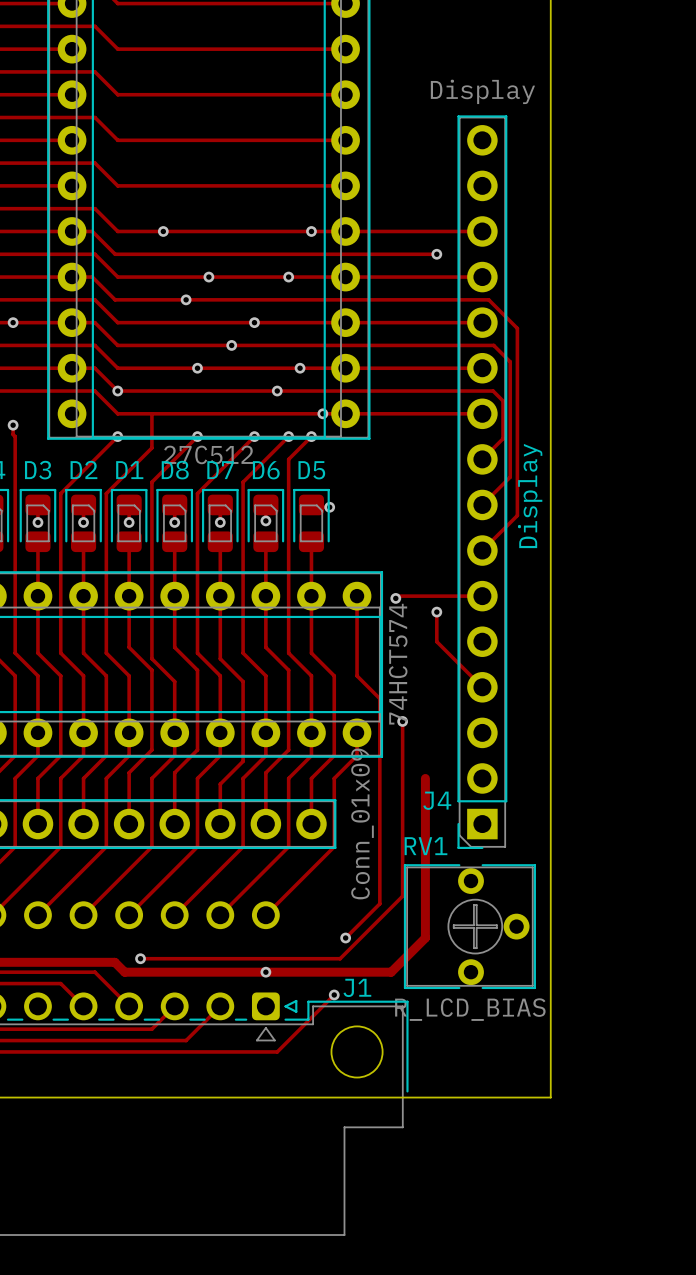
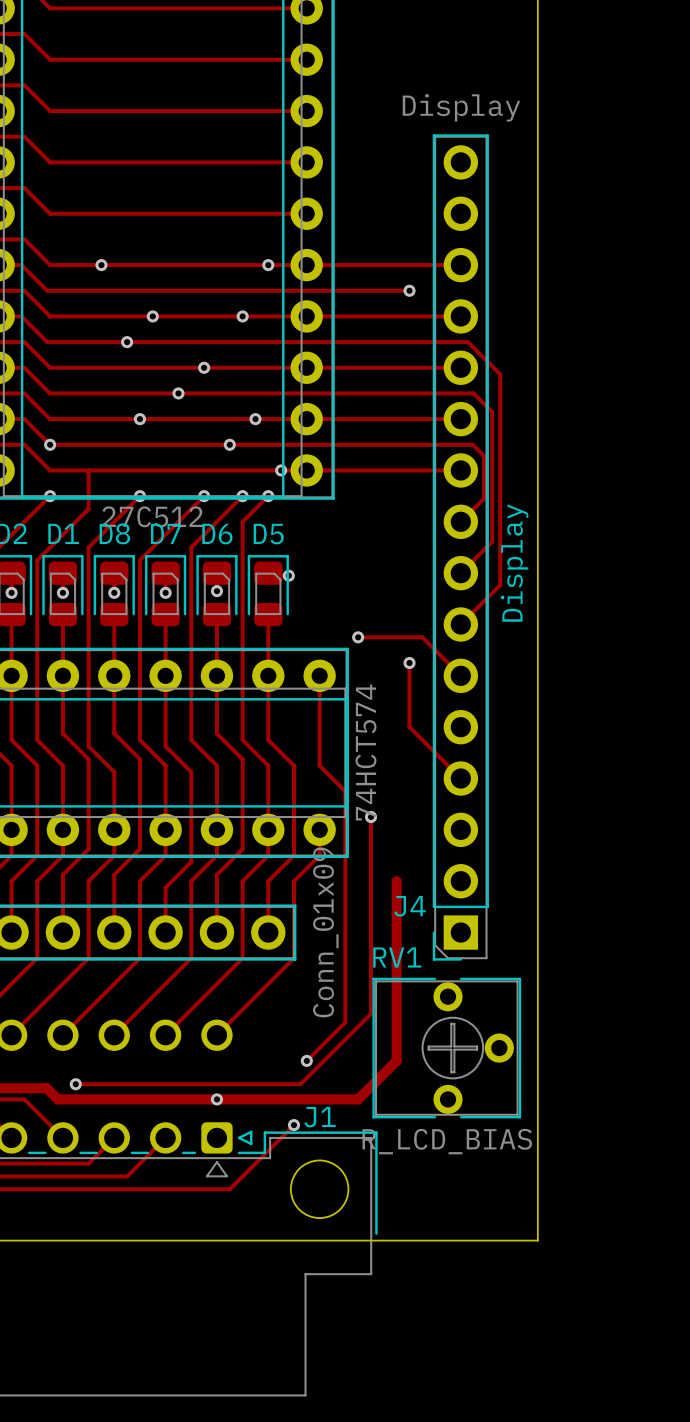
via: none -> (358, 637)
track: none -> (409, 663) (409, 693)
via: none -> (409, 663)
track: (482, 596) (398, 596) (395, 598) -> (460, 675) (422, 637) (358, 637)
via: (395, 598) -> none
via: (436, 612) -> none

